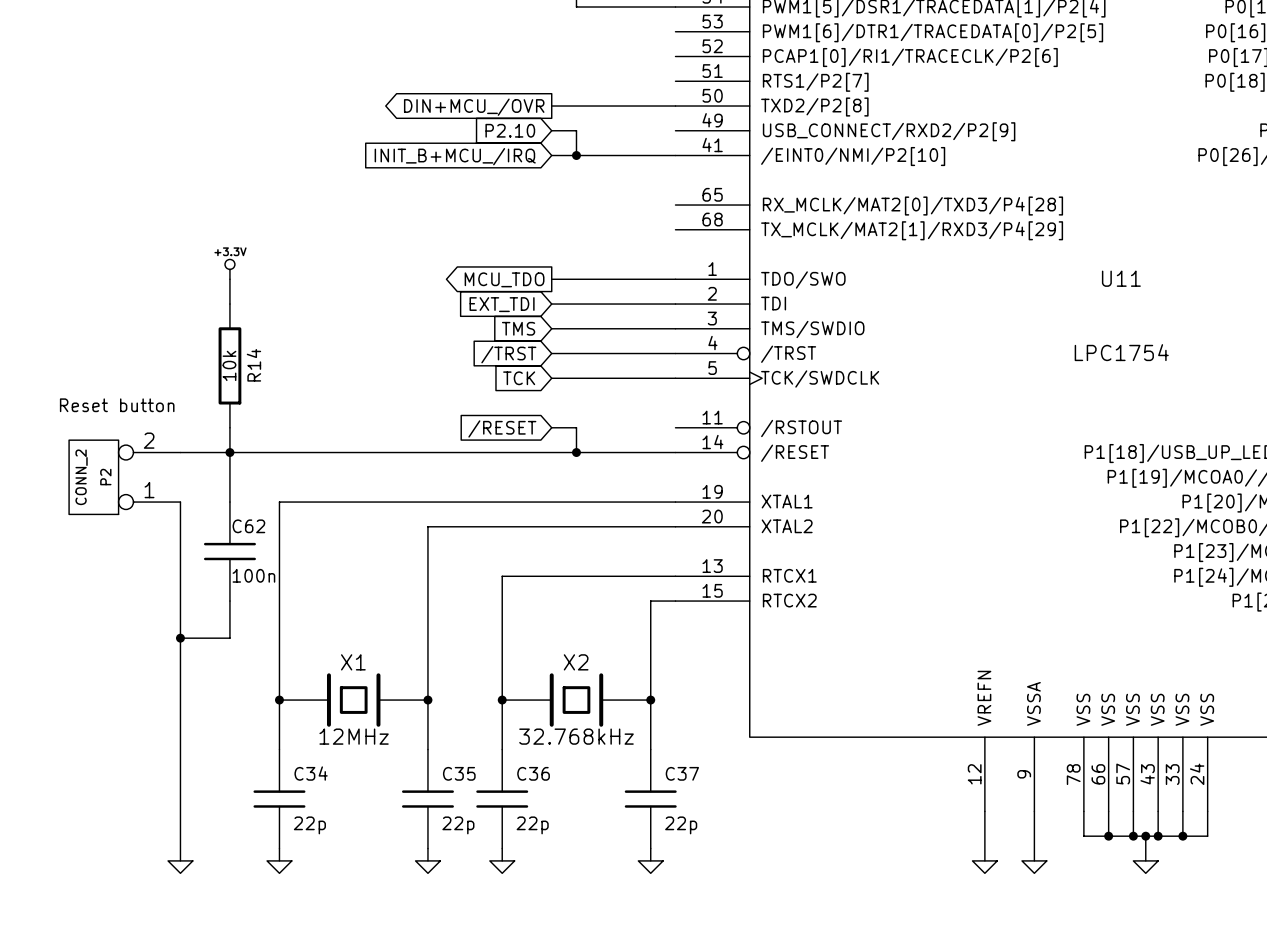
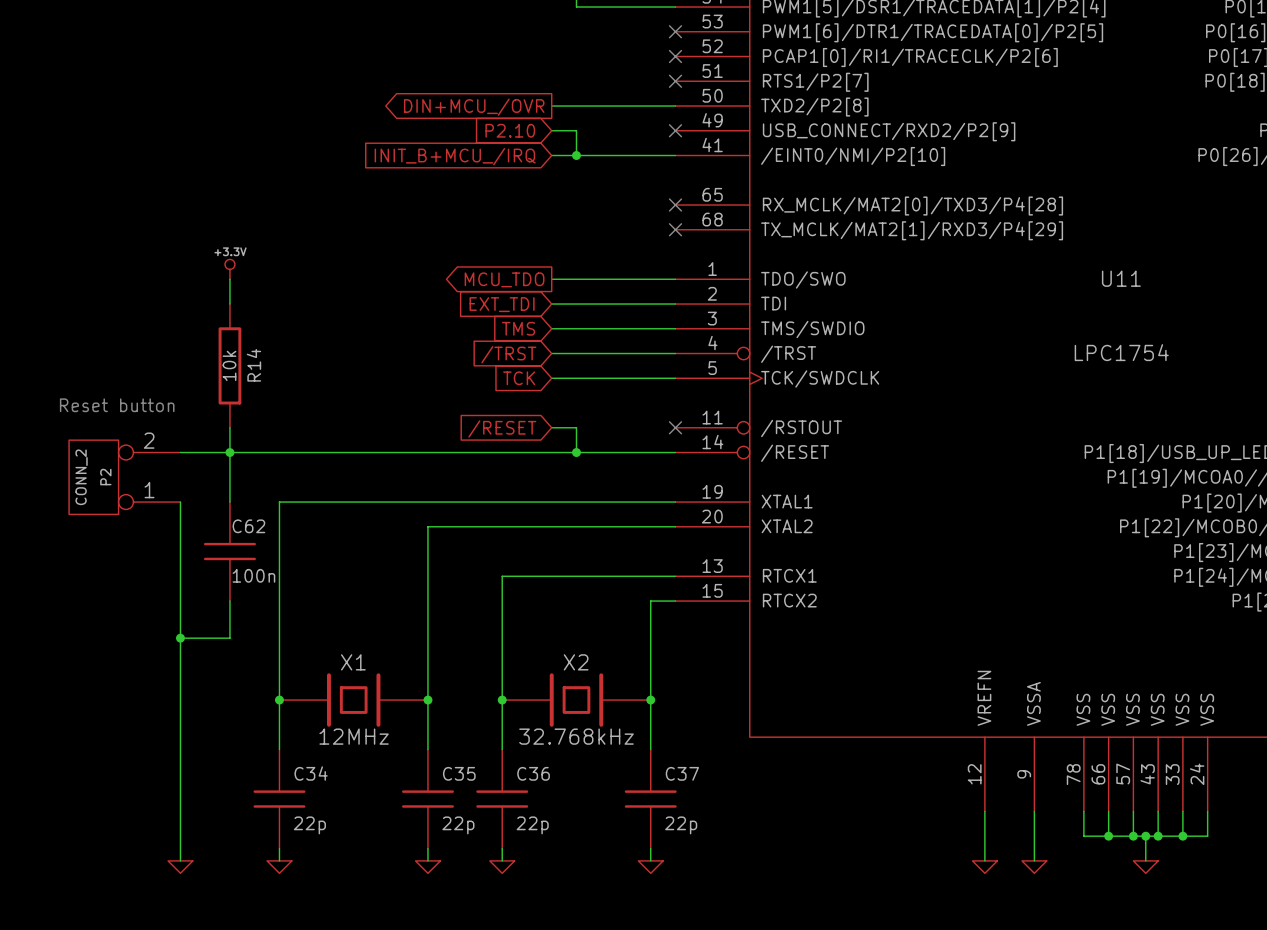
no-connect mark: none -> (675, 31)
no-connect mark: none -> (675, 56)
no-connect mark: none -> (675, 81)
no-connect mark: none -> (675, 130)
no-connect mark: none -> (675, 205)
no-connect mark: none -> (675, 229)
no-connect mark: none -> (675, 427)

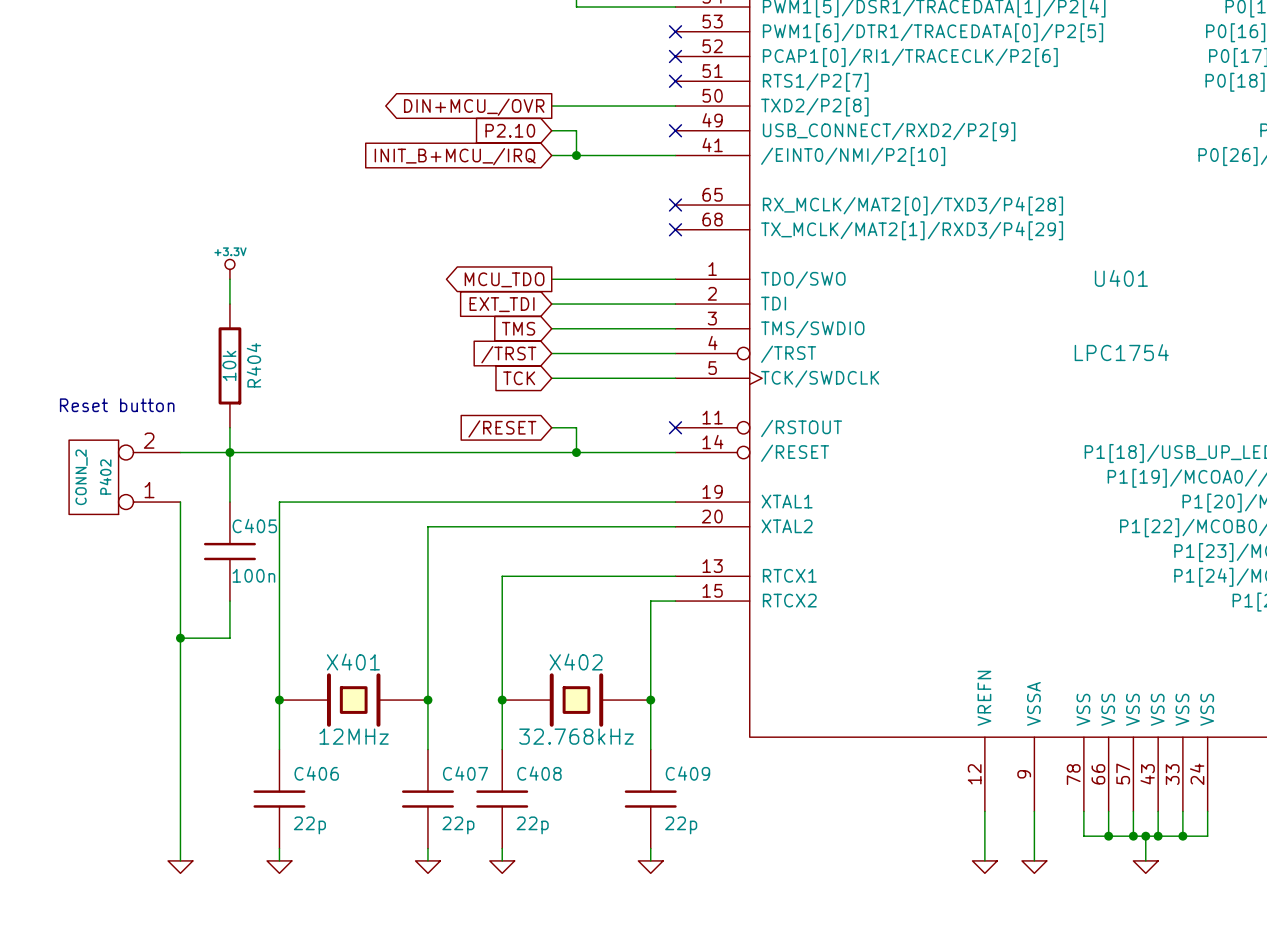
U11 name: U11 (1121, 278) -> U401 (1121, 278)
R14 name: R14 (253, 365) -> R404 (253, 365)
P2 name: P2 (105, 477) -> P402 (105, 477)
C62 name: C62 (248, 526) -> C405 (254, 526)
X1 name: X1 (353, 662) -> X401 (353, 662)
X2 name: X2 (576, 662) -> X402 (576, 662)
C34 name: C34 (311, 773) -> C406 (316, 773)
C35 name: C35 (459, 773) -> C407 (465, 773)
C36 name: C36 (533, 773) -> C408 (539, 773)
C37 name: C37 (682, 773) -> C409 (687, 773)

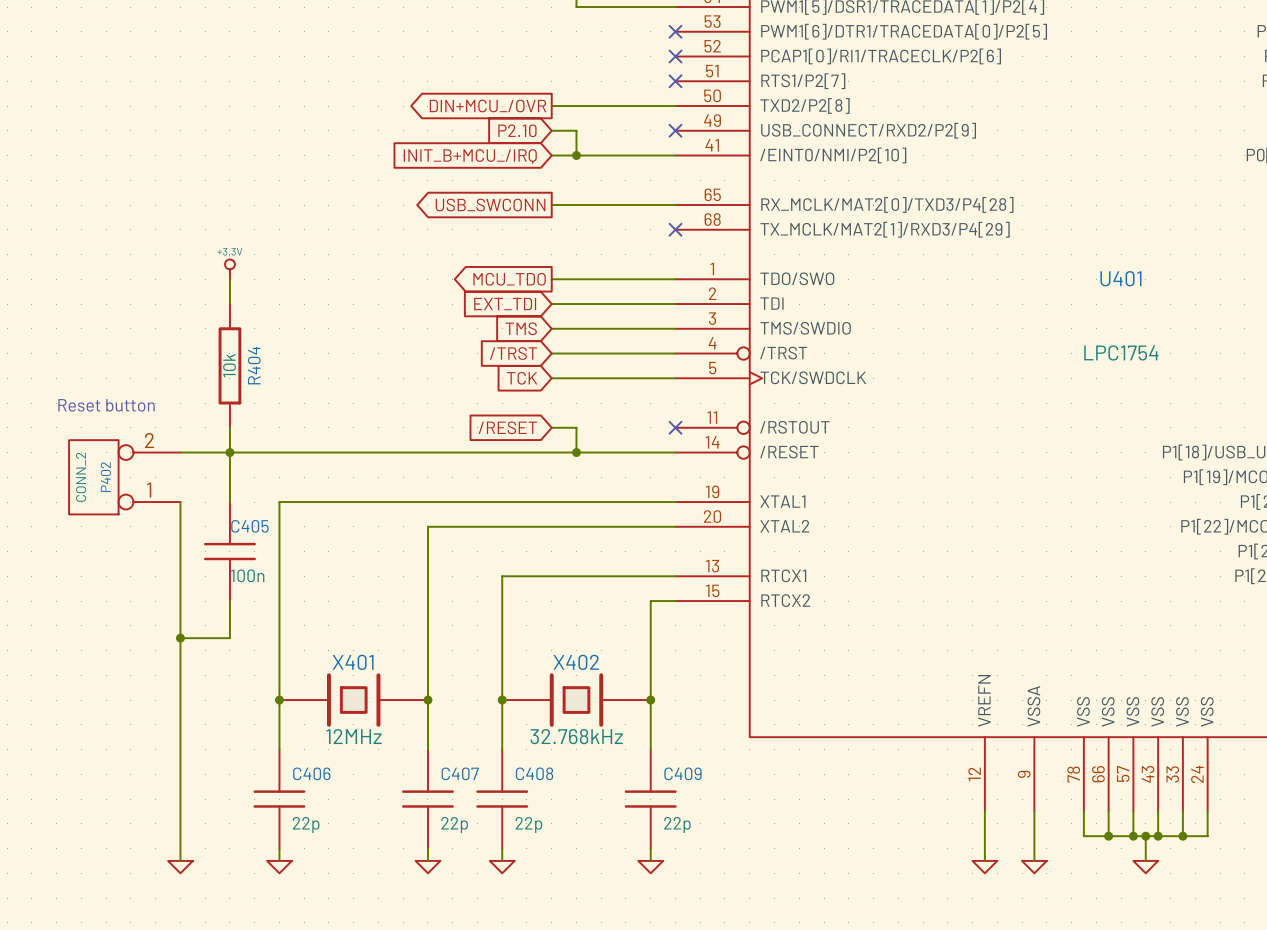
global label: none -> USB_SWCONN (490, 205)
wire: none -> (551, 205) (675, 205)
no-connect mark: (675, 205) -> none

